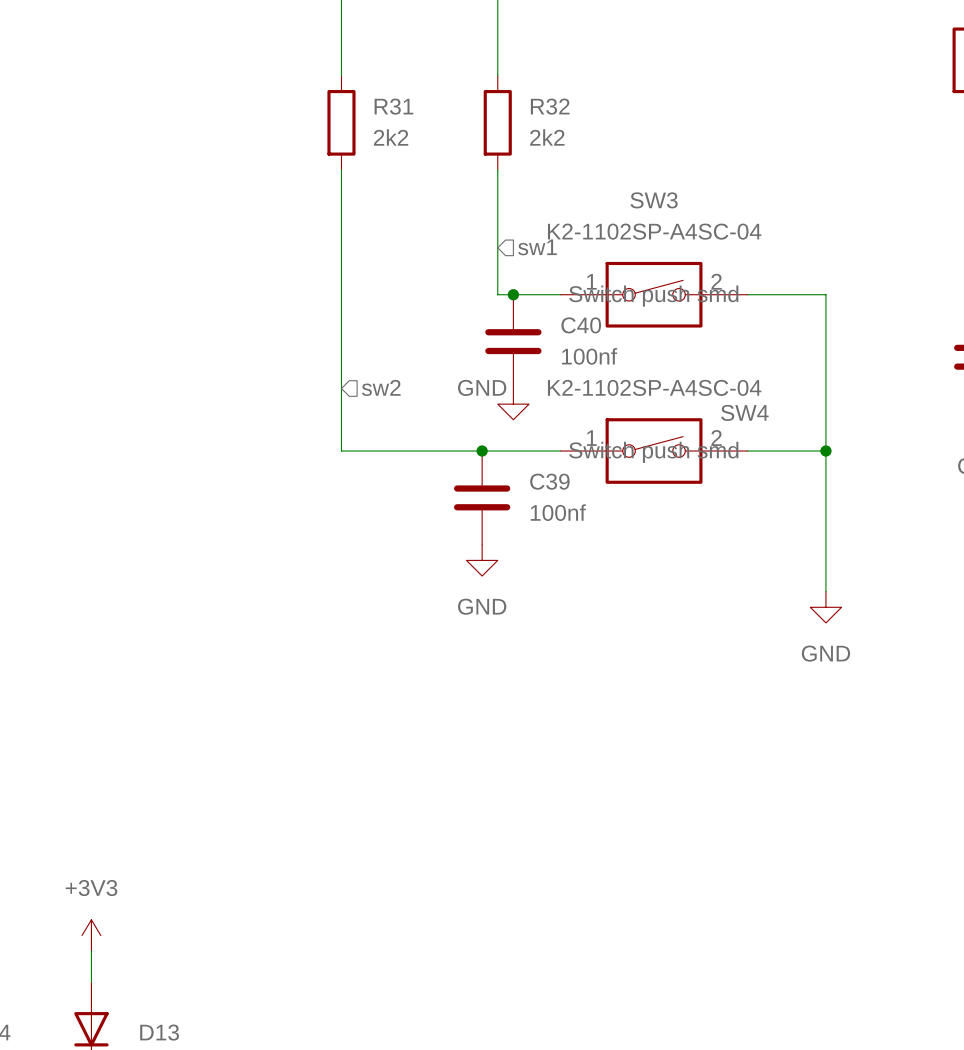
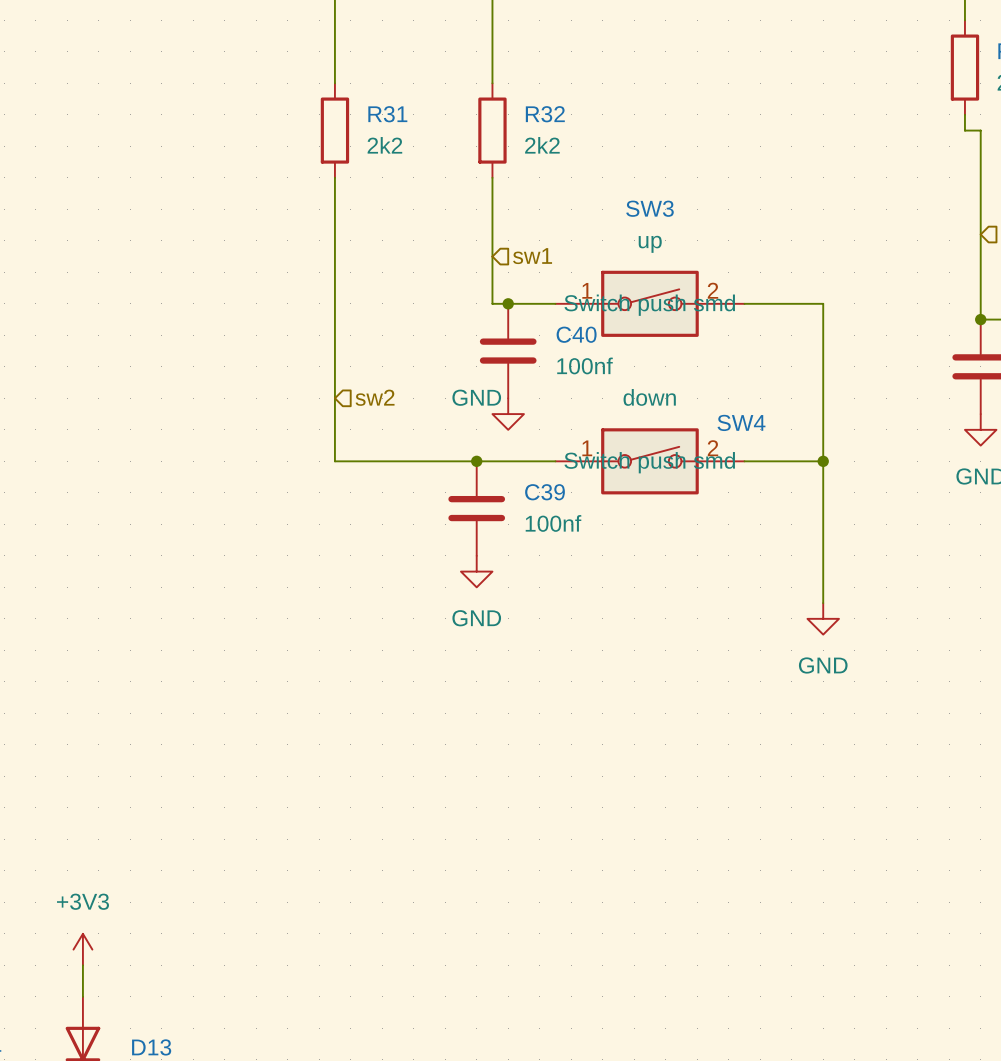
SW3 value: K2-1102SP-A4SC-04 (654, 231) -> up (650, 244)
SW4 value: K2-1102SP-A4SC-04 (654, 387) -> down (649, 397)

